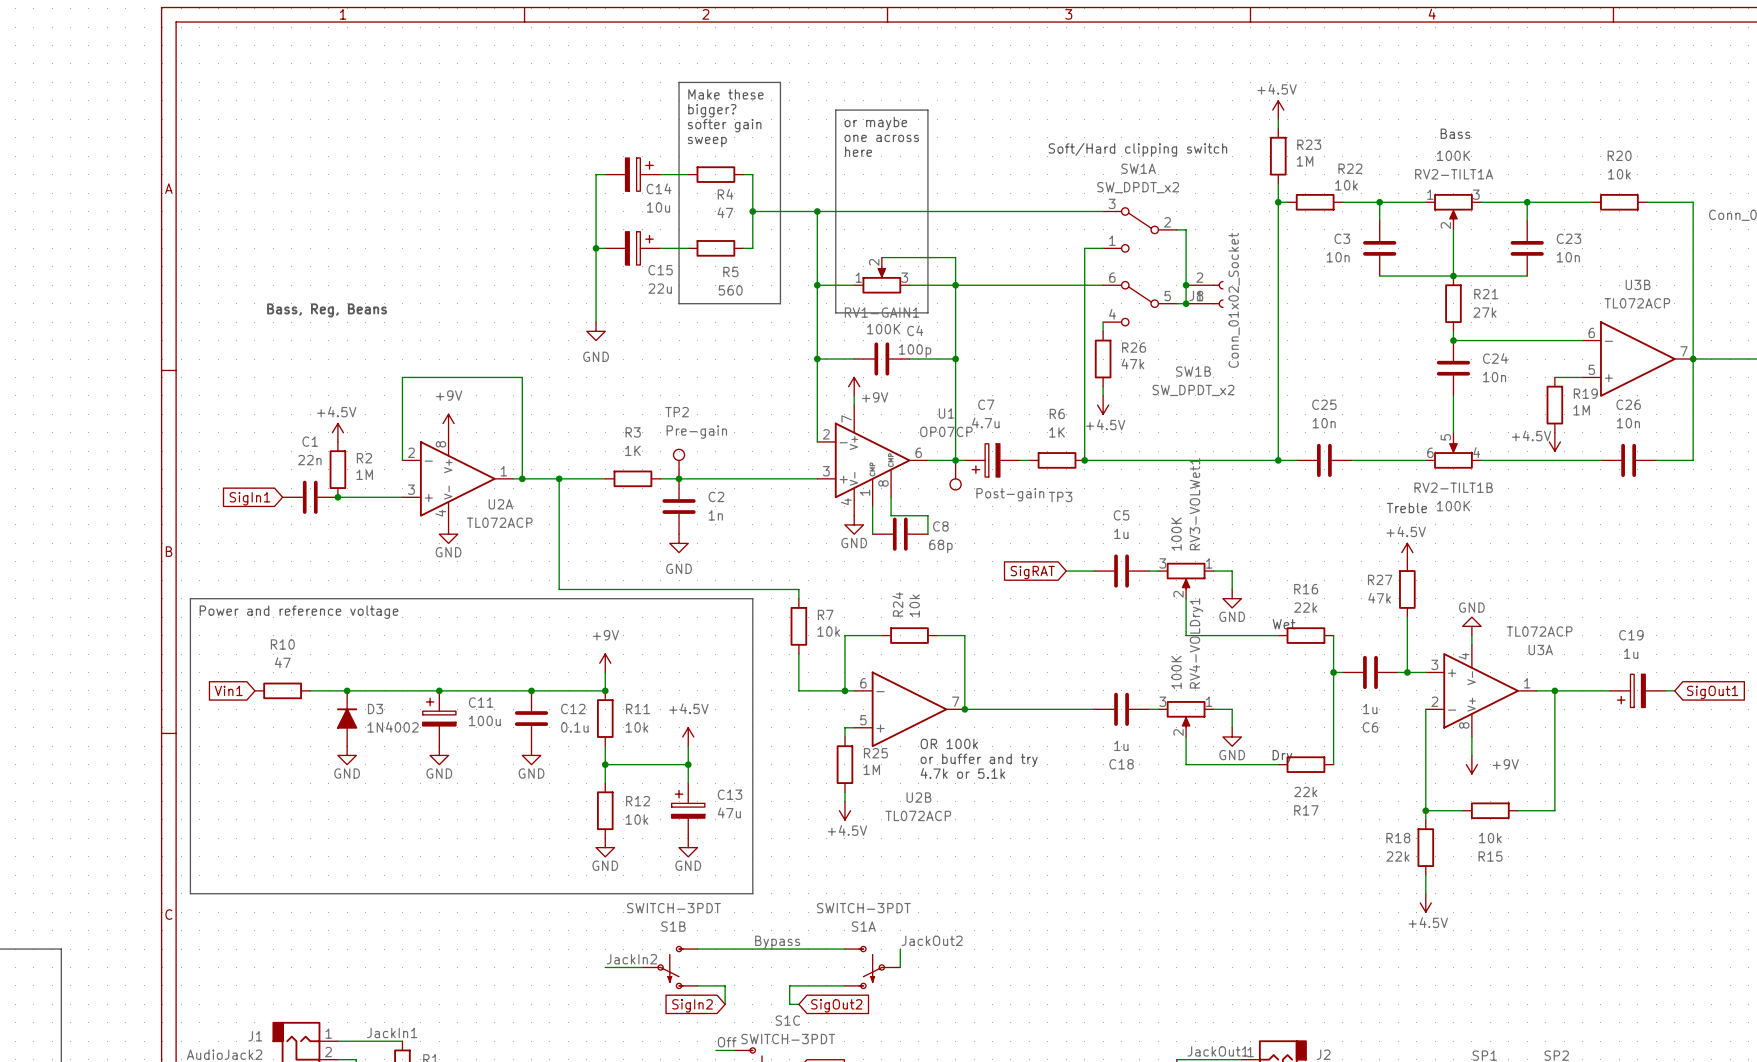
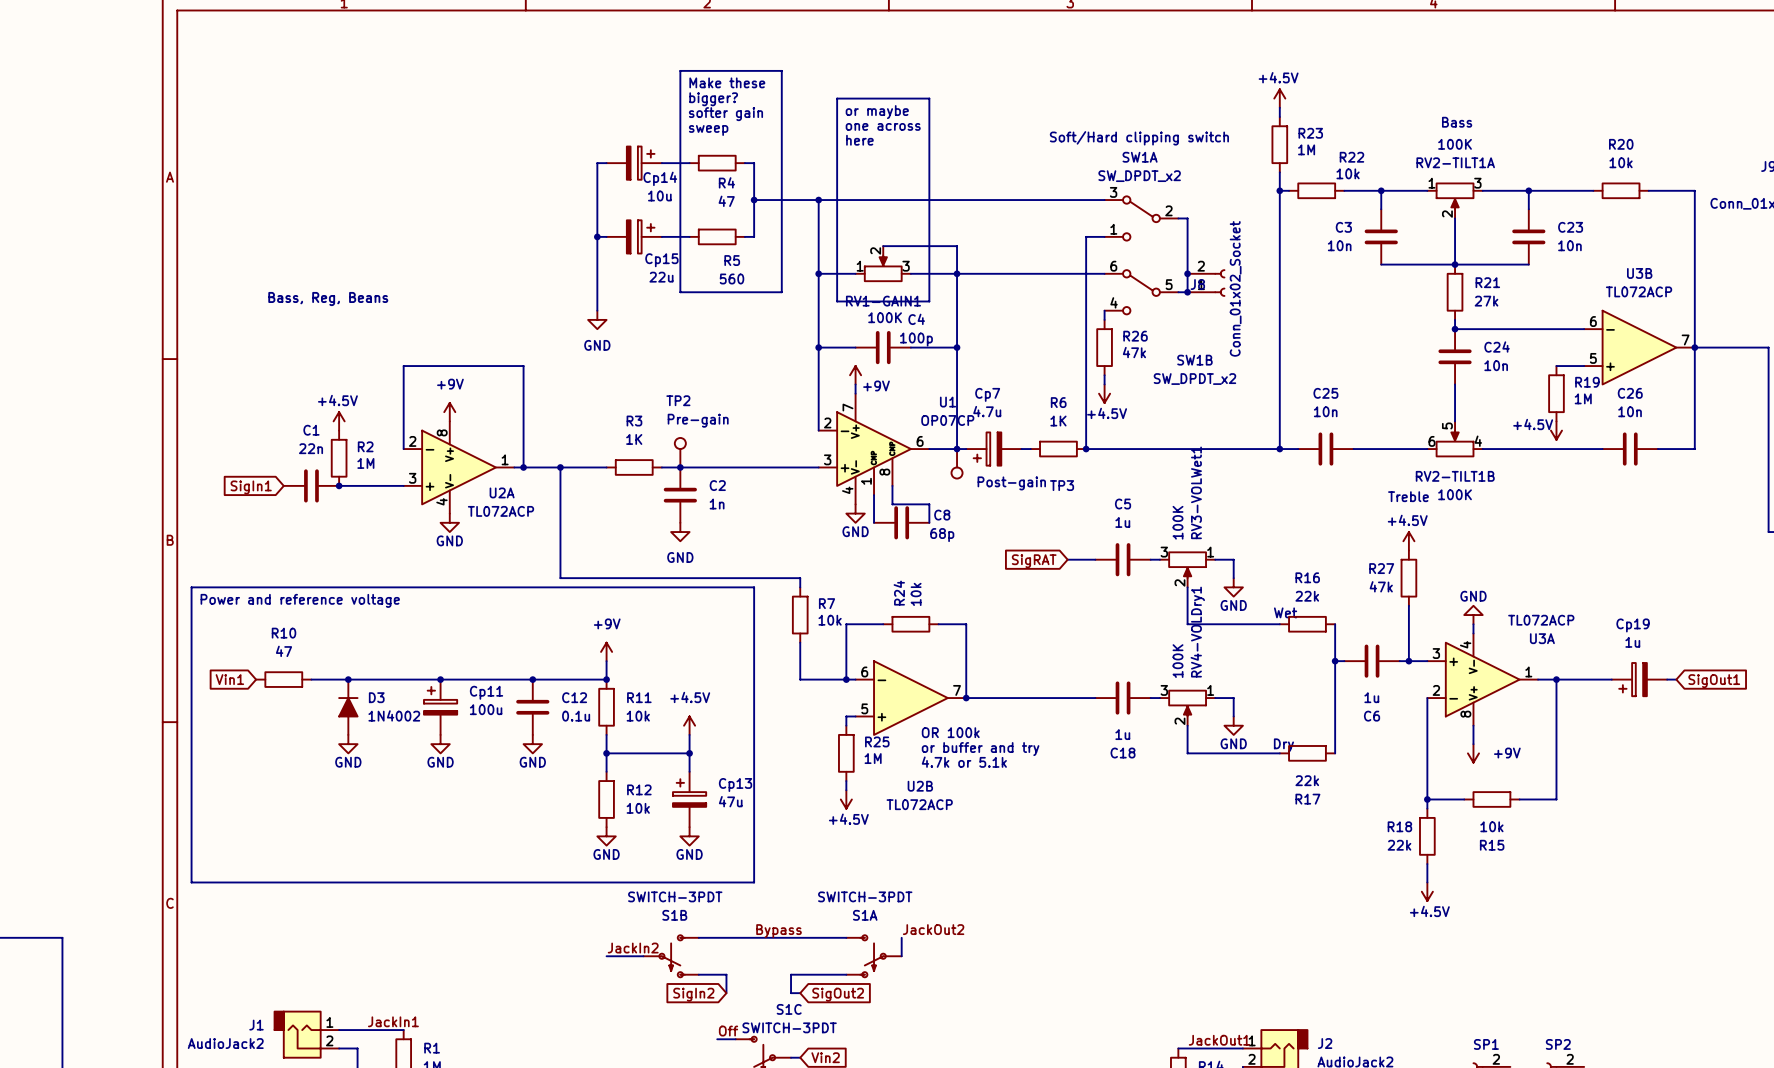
C14 name: C14 (658, 188) -> Cp14 (660, 178)
C15 name: C15 (660, 270) -> Cp15 (661, 260)
C7 name: C7 (986, 404) -> Cp7 (987, 394)
C19 name: C19 (1631, 635) -> Cp19 (1633, 625)
C11 name: C11 (481, 702) -> Cp11 (486, 692)
C13 name: C13 (730, 794) -> Cp13 (735, 784)

